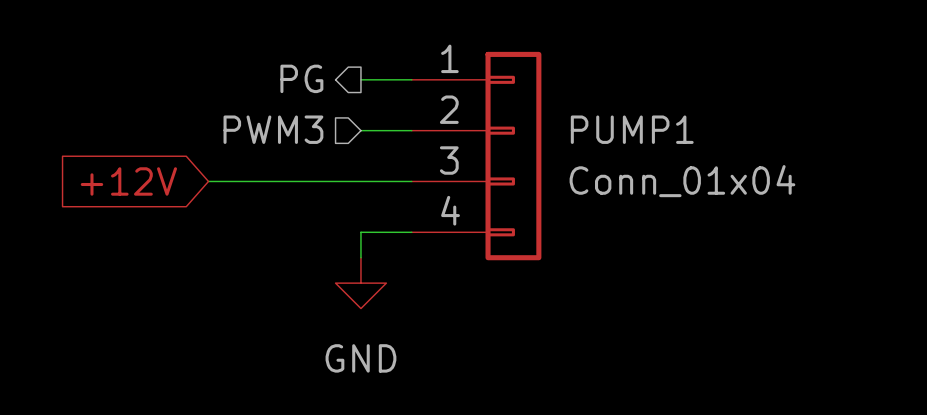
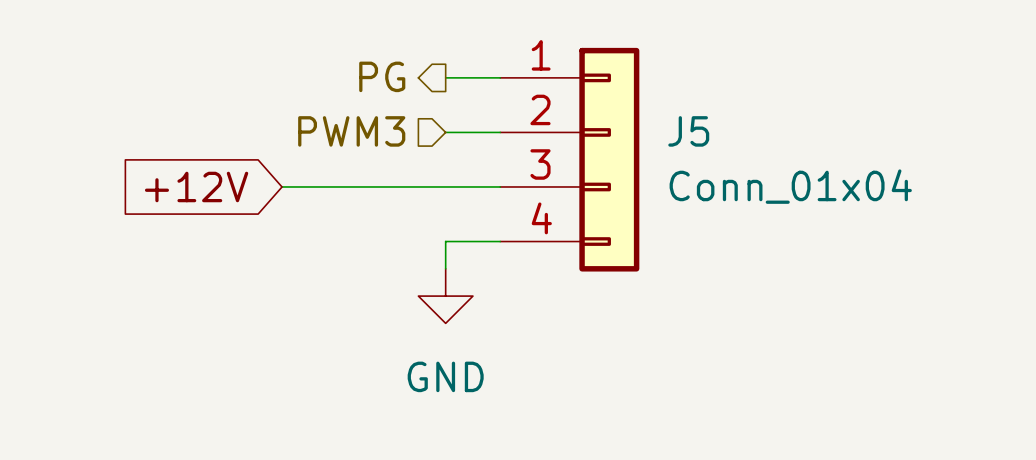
PUMP1 name: PUMP1 (632, 129) -> J5 (688, 131)

